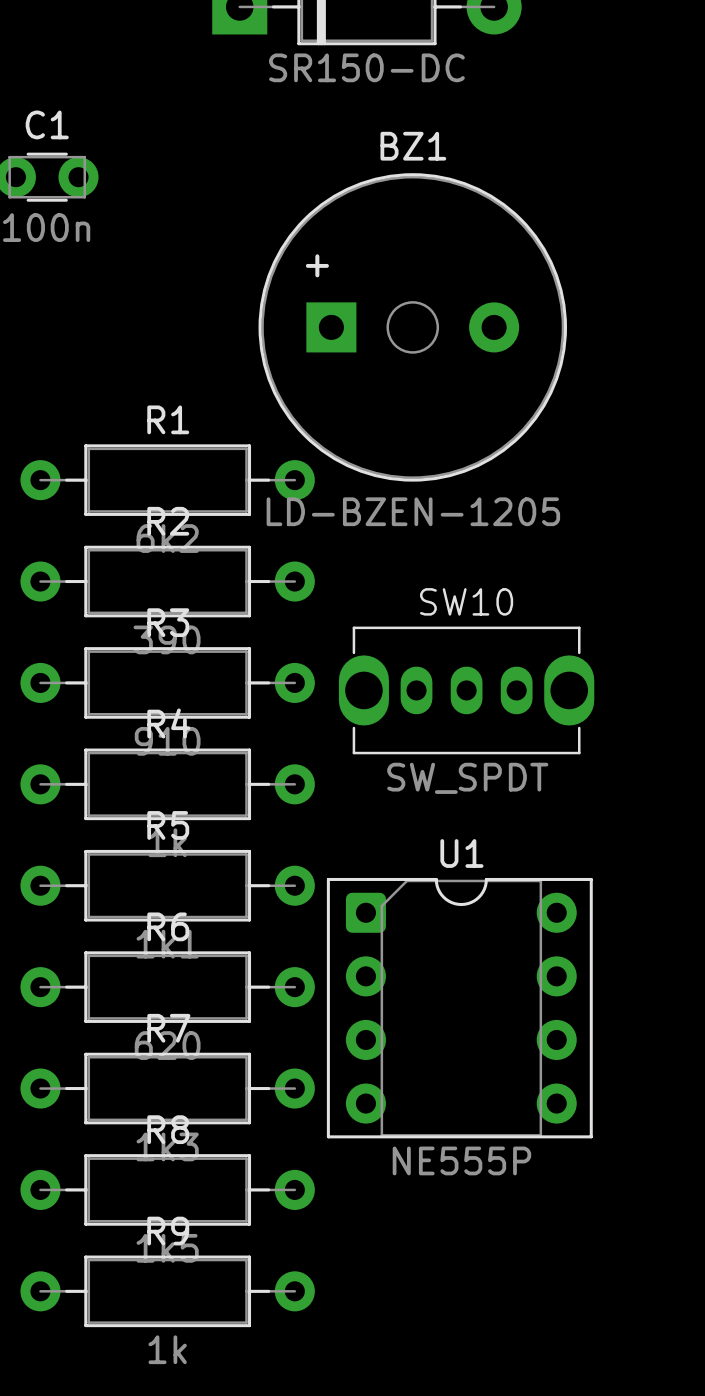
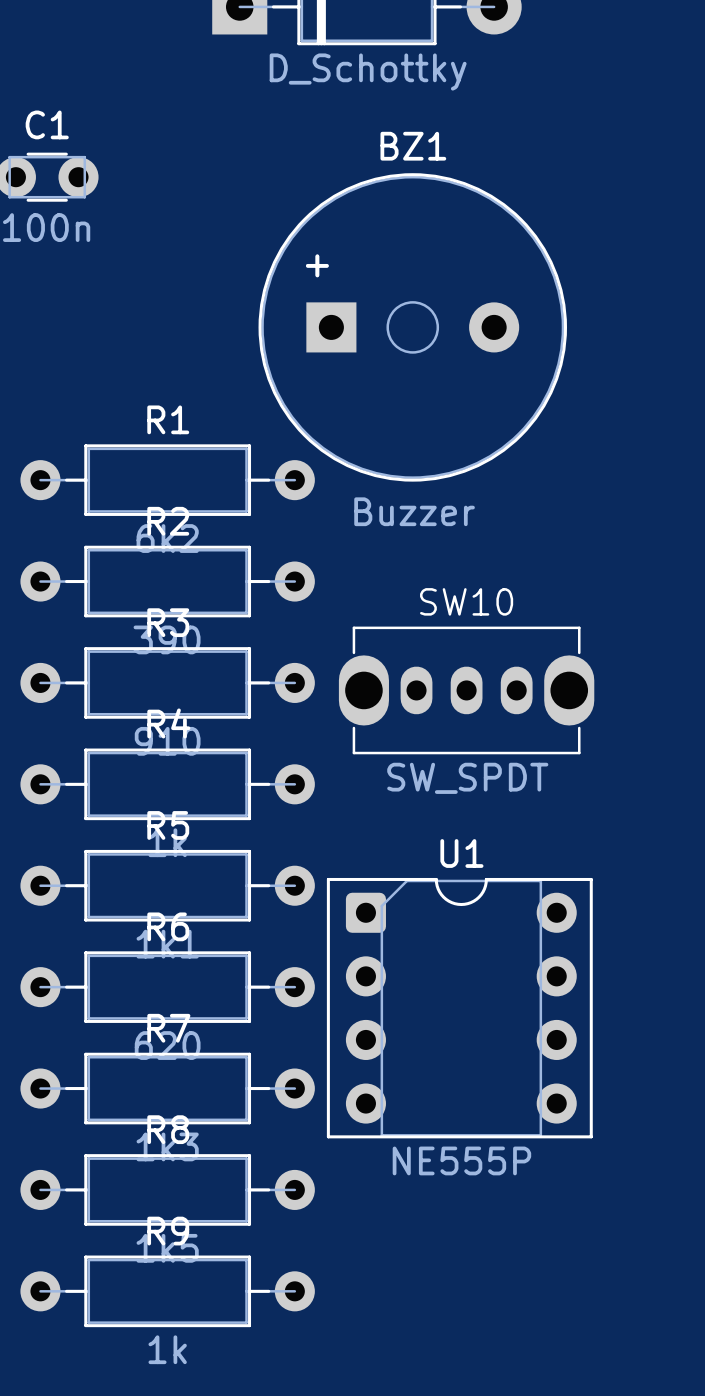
part value: SR150-DC (366, 67) -> D_Schottky (368, 72)
BZ1 value: LD-BZEN-1205 (413, 511) -> Buzzer (414, 511)

